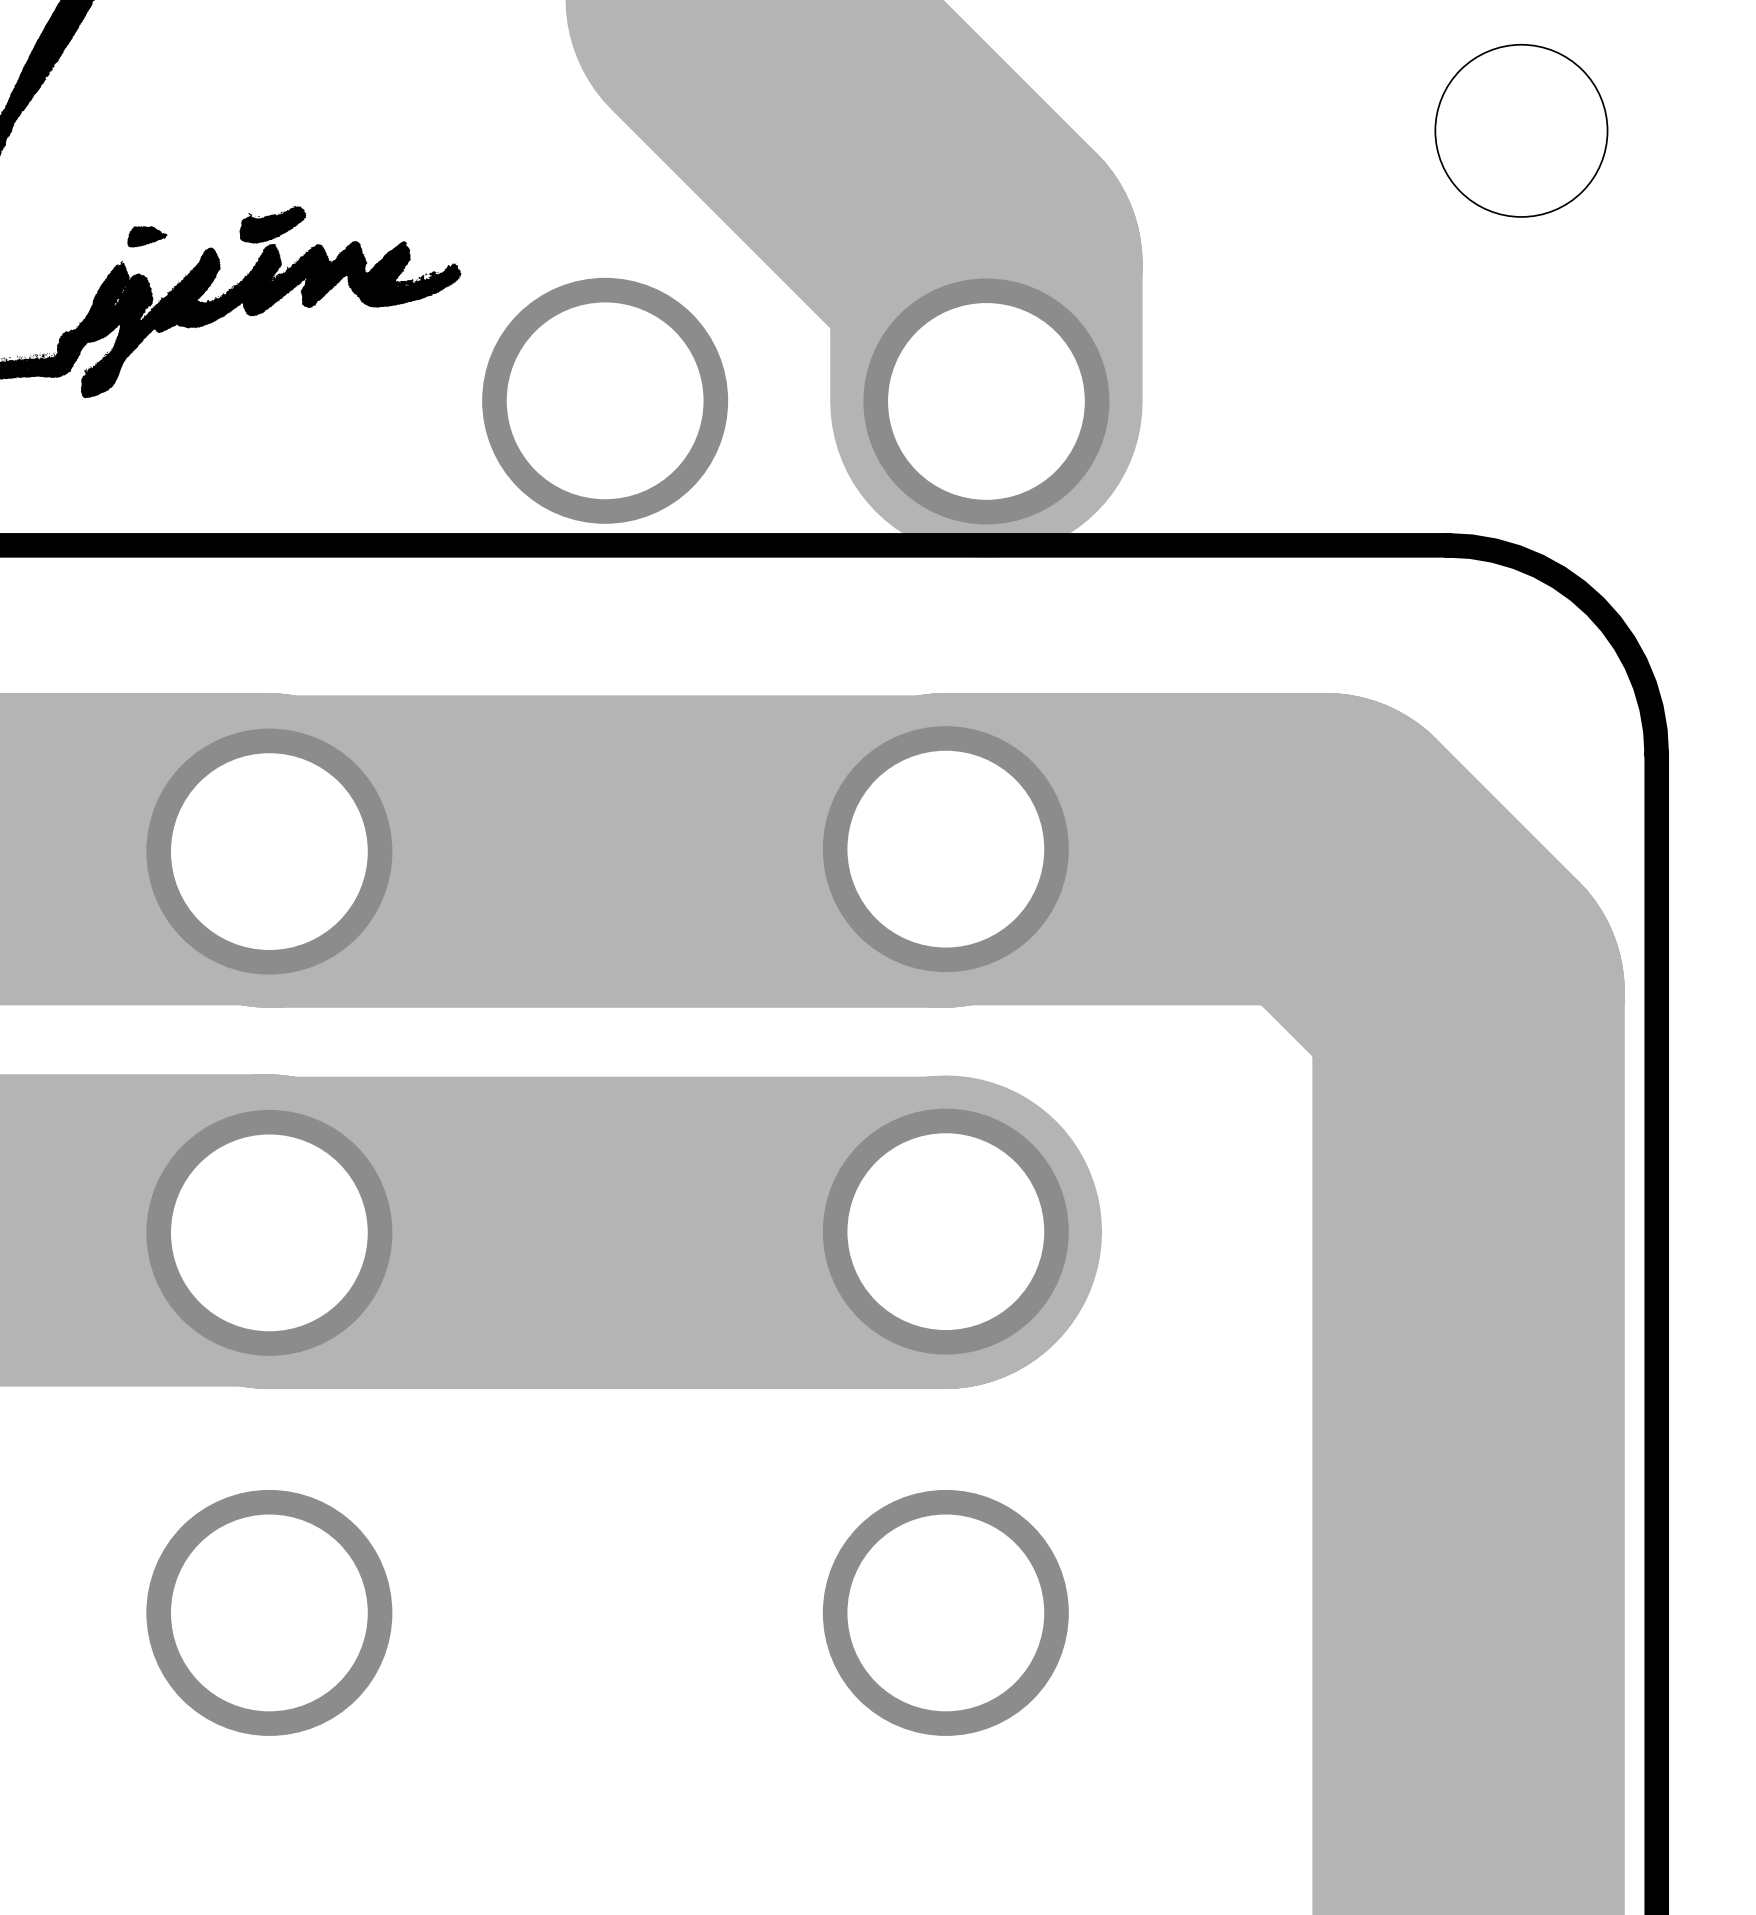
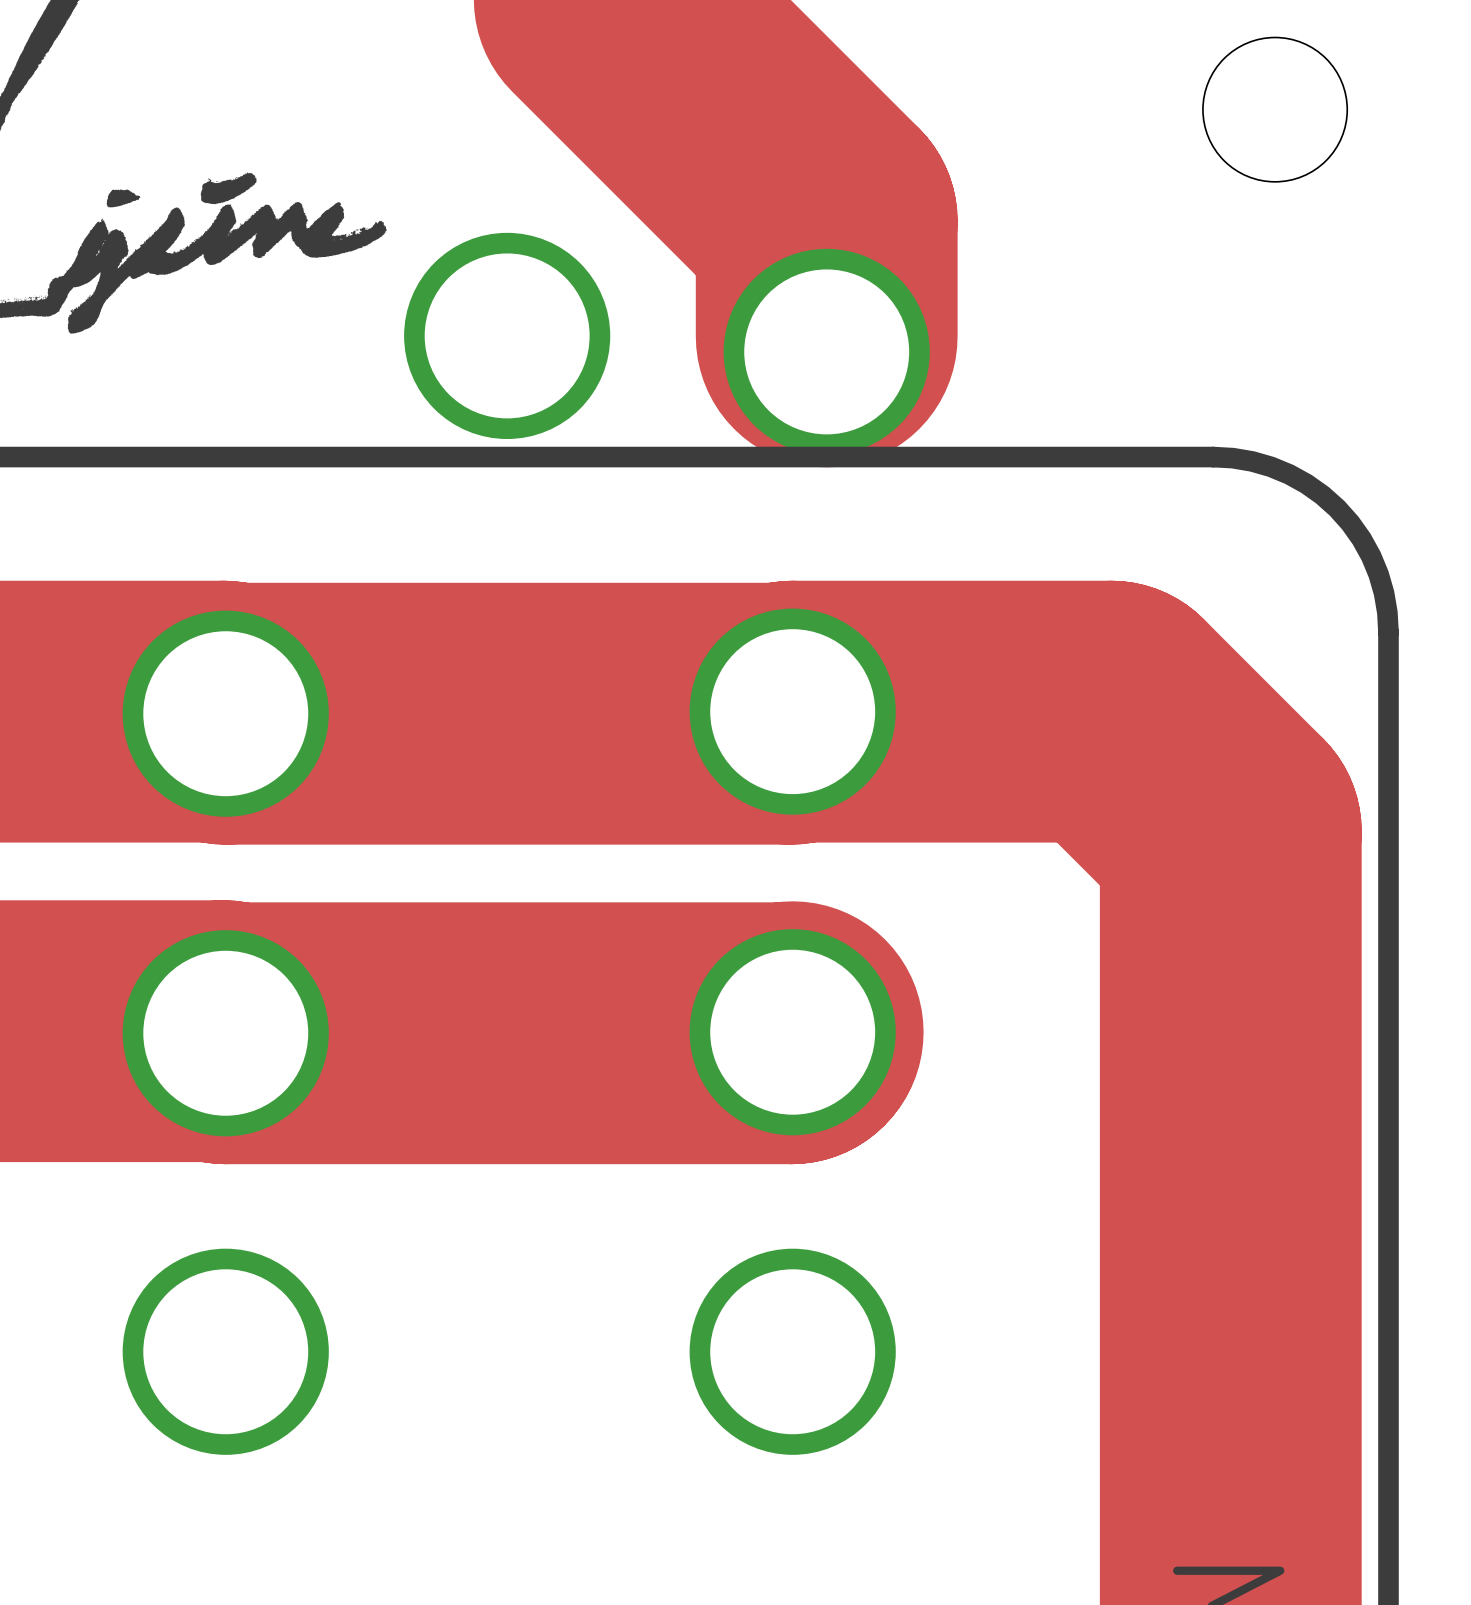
part position: (986, 401) -> (826, 351)

